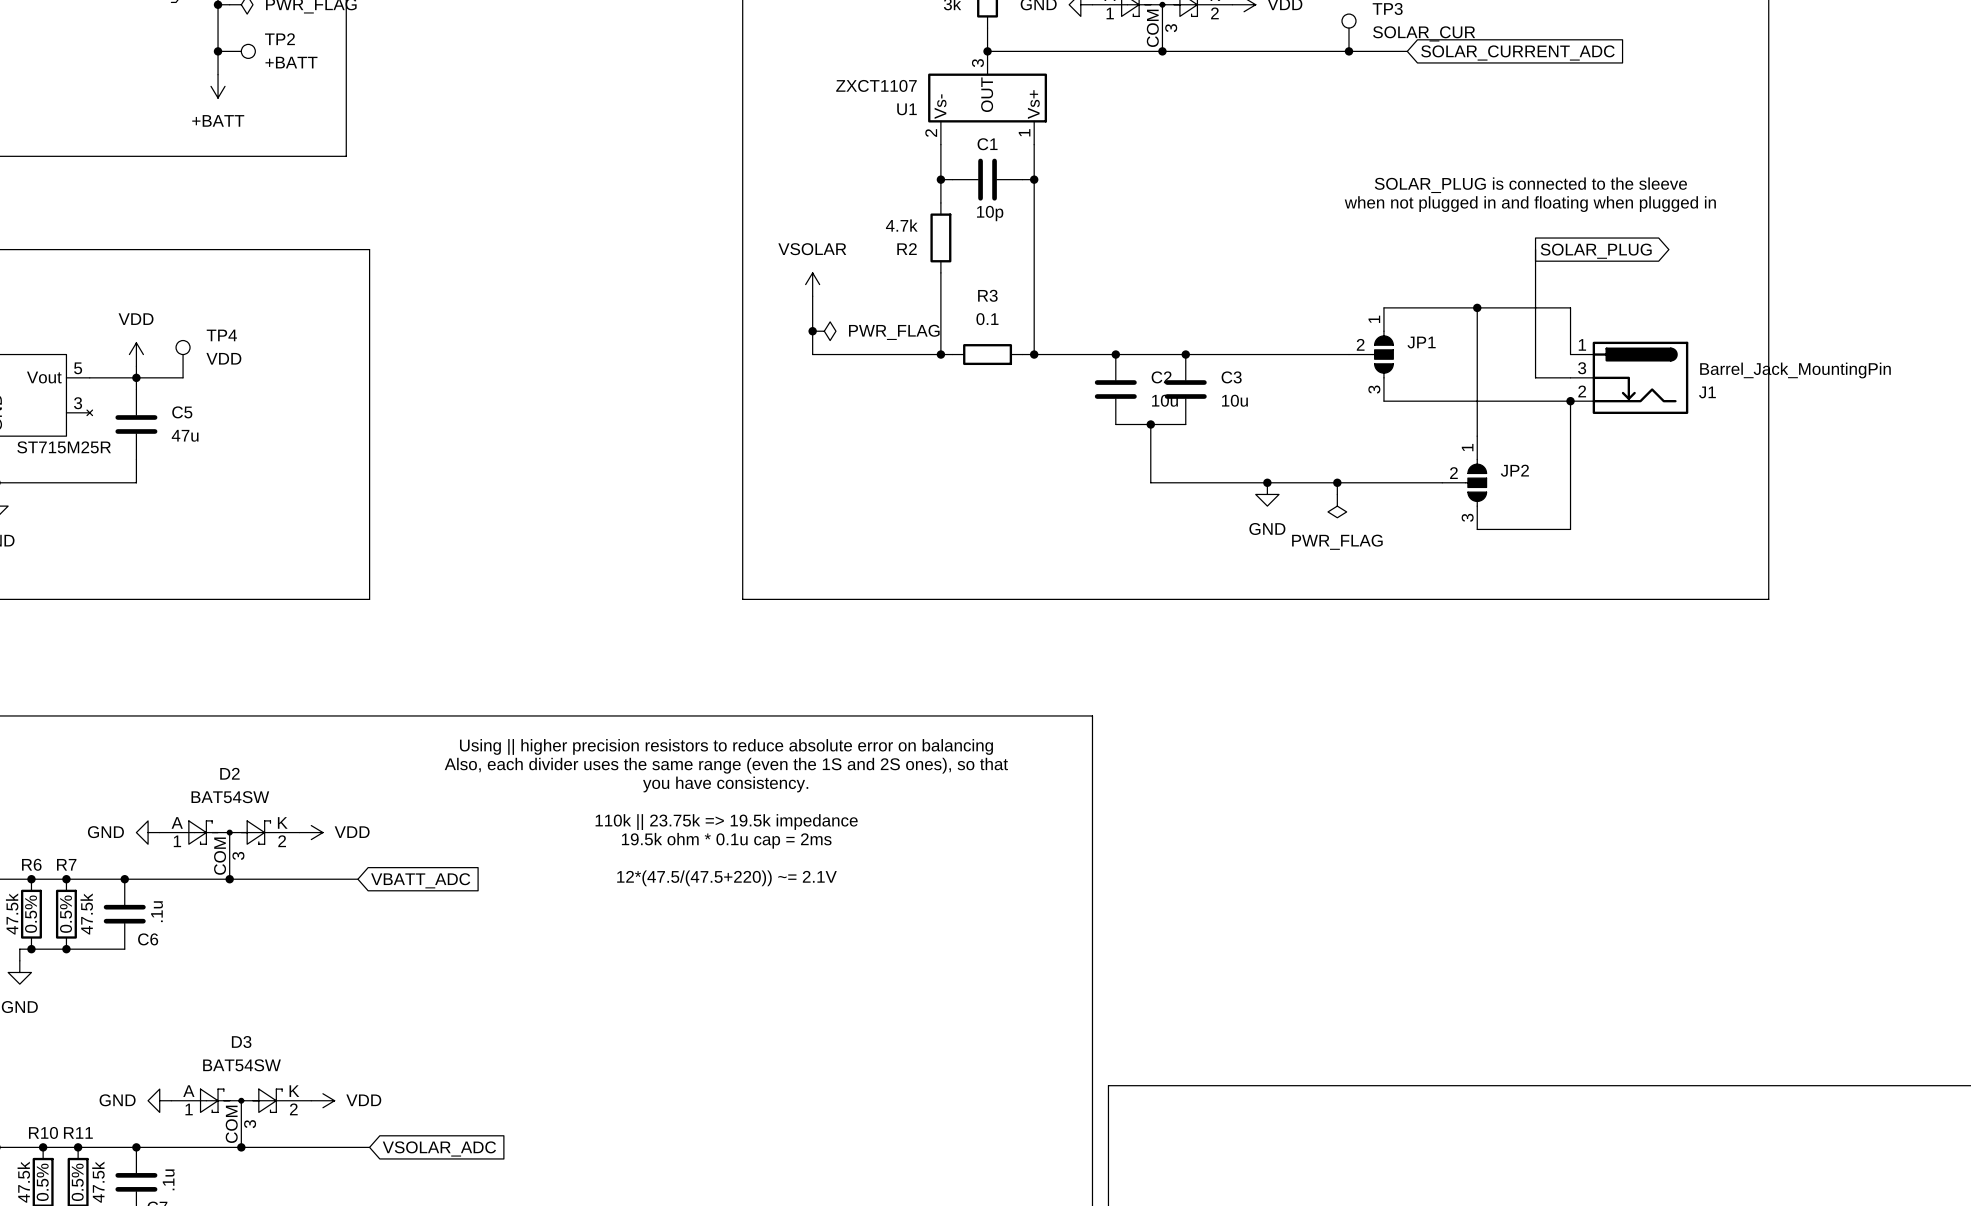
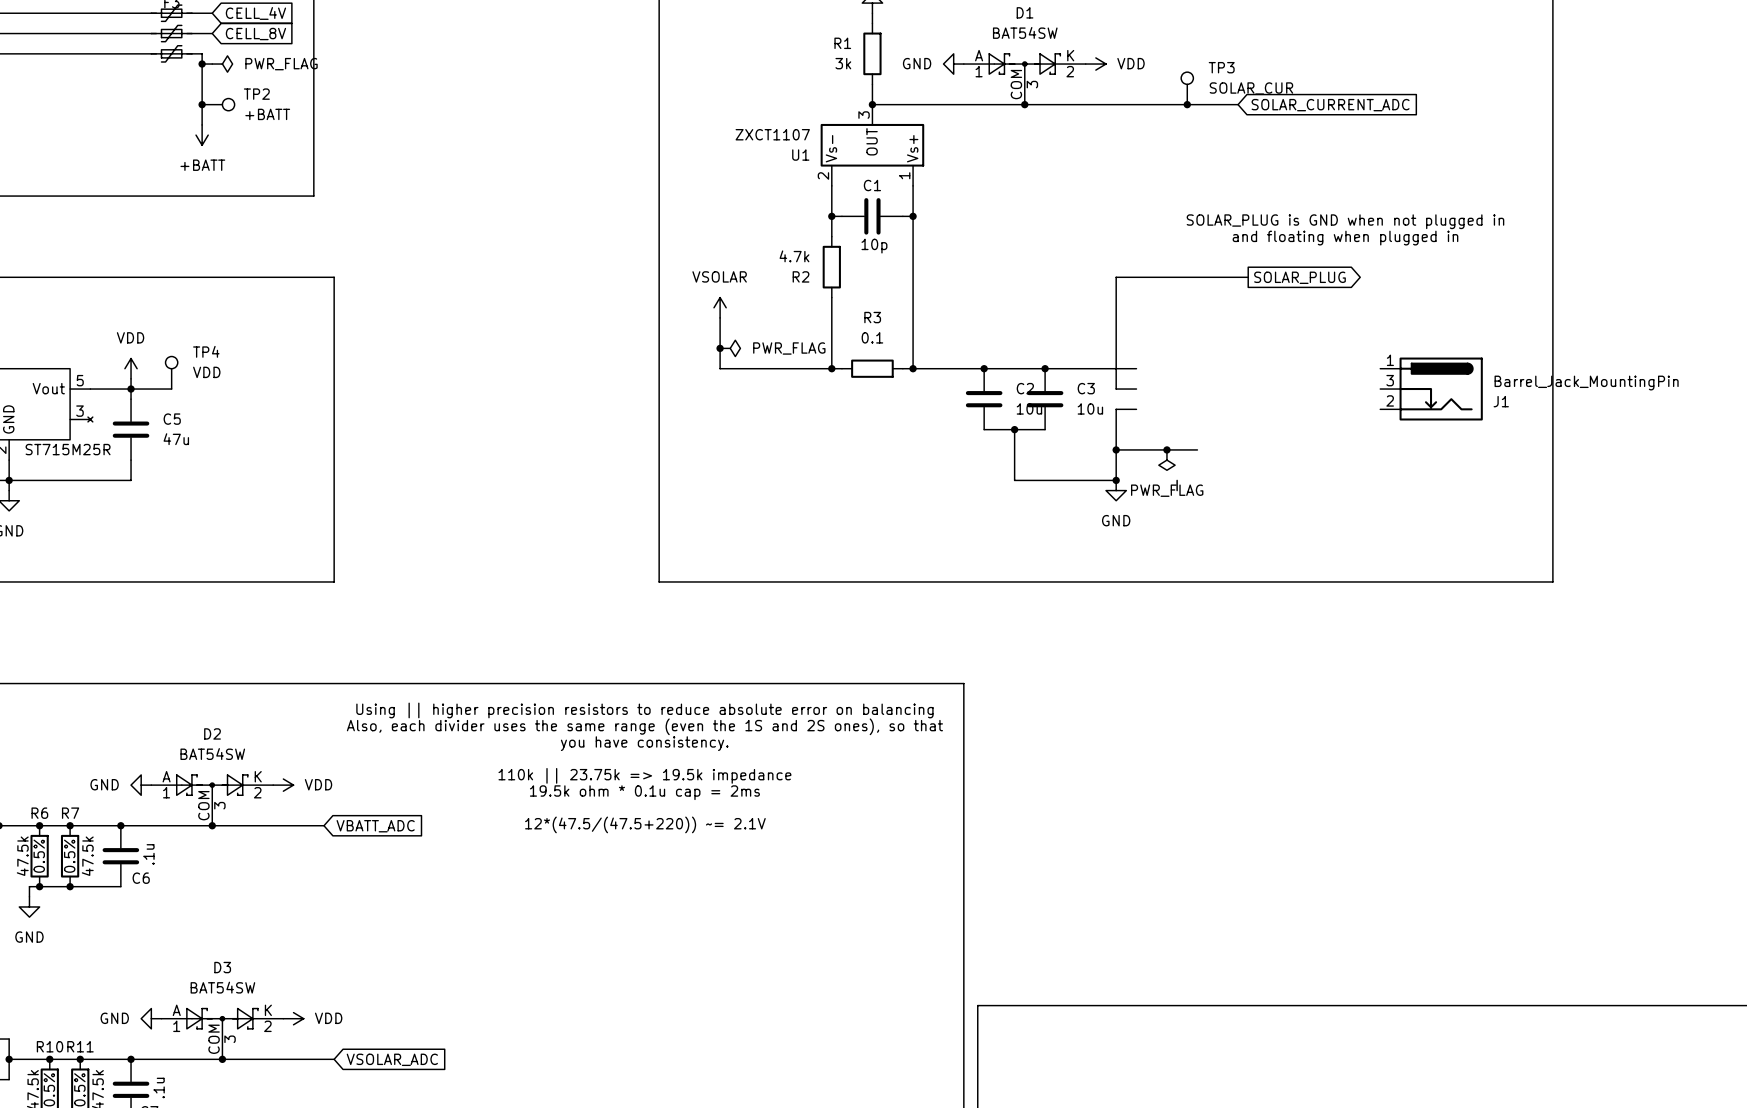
text: SOLAR_PLUG is connected to the sleeve (1530, 185) -> SOLAR_PLUG is GND when not plugged in (1345, 221)
text: when not plugged in and floating when plugged in (1530, 204) -> and floating when plugged in (1345, 238)
wire: none -> (1248, 277) (1116, 277) (1116, 389) (1136, 389)
wire: (1535, 249) (1535, 377) (1570, 377) -> none
global label position: SOLAR_PLUG (1596, 251) -> SOLAR_PLUG (1299, 277)
wire: (1383, 307) (1570, 307) (1570, 354) -> none
wire: (1477, 307) (1477, 436) -> none
junction: (1477, 307) -> none
wire: (1290, 354) (1348, 354) -> none
JP1: (1371, 354) -> none
wire: (1383, 401) (1570, 401) (1570, 529) (1477, 529) -> none
junction: (1570, 401) -> none
wire: none -> (1116, 449) (1197, 449)
junction: none -> (1116, 449)
wire: (1267, 482) (1442, 482) -> (1116, 480) (1116, 409) (1136, 409)
junction position: (1337, 482) -> (1166, 449)
JP2: (1464, 482) -> none
power symbol position: PWR_FLAG (1337, 506) -> PWR_FLAG (1166, 460)

